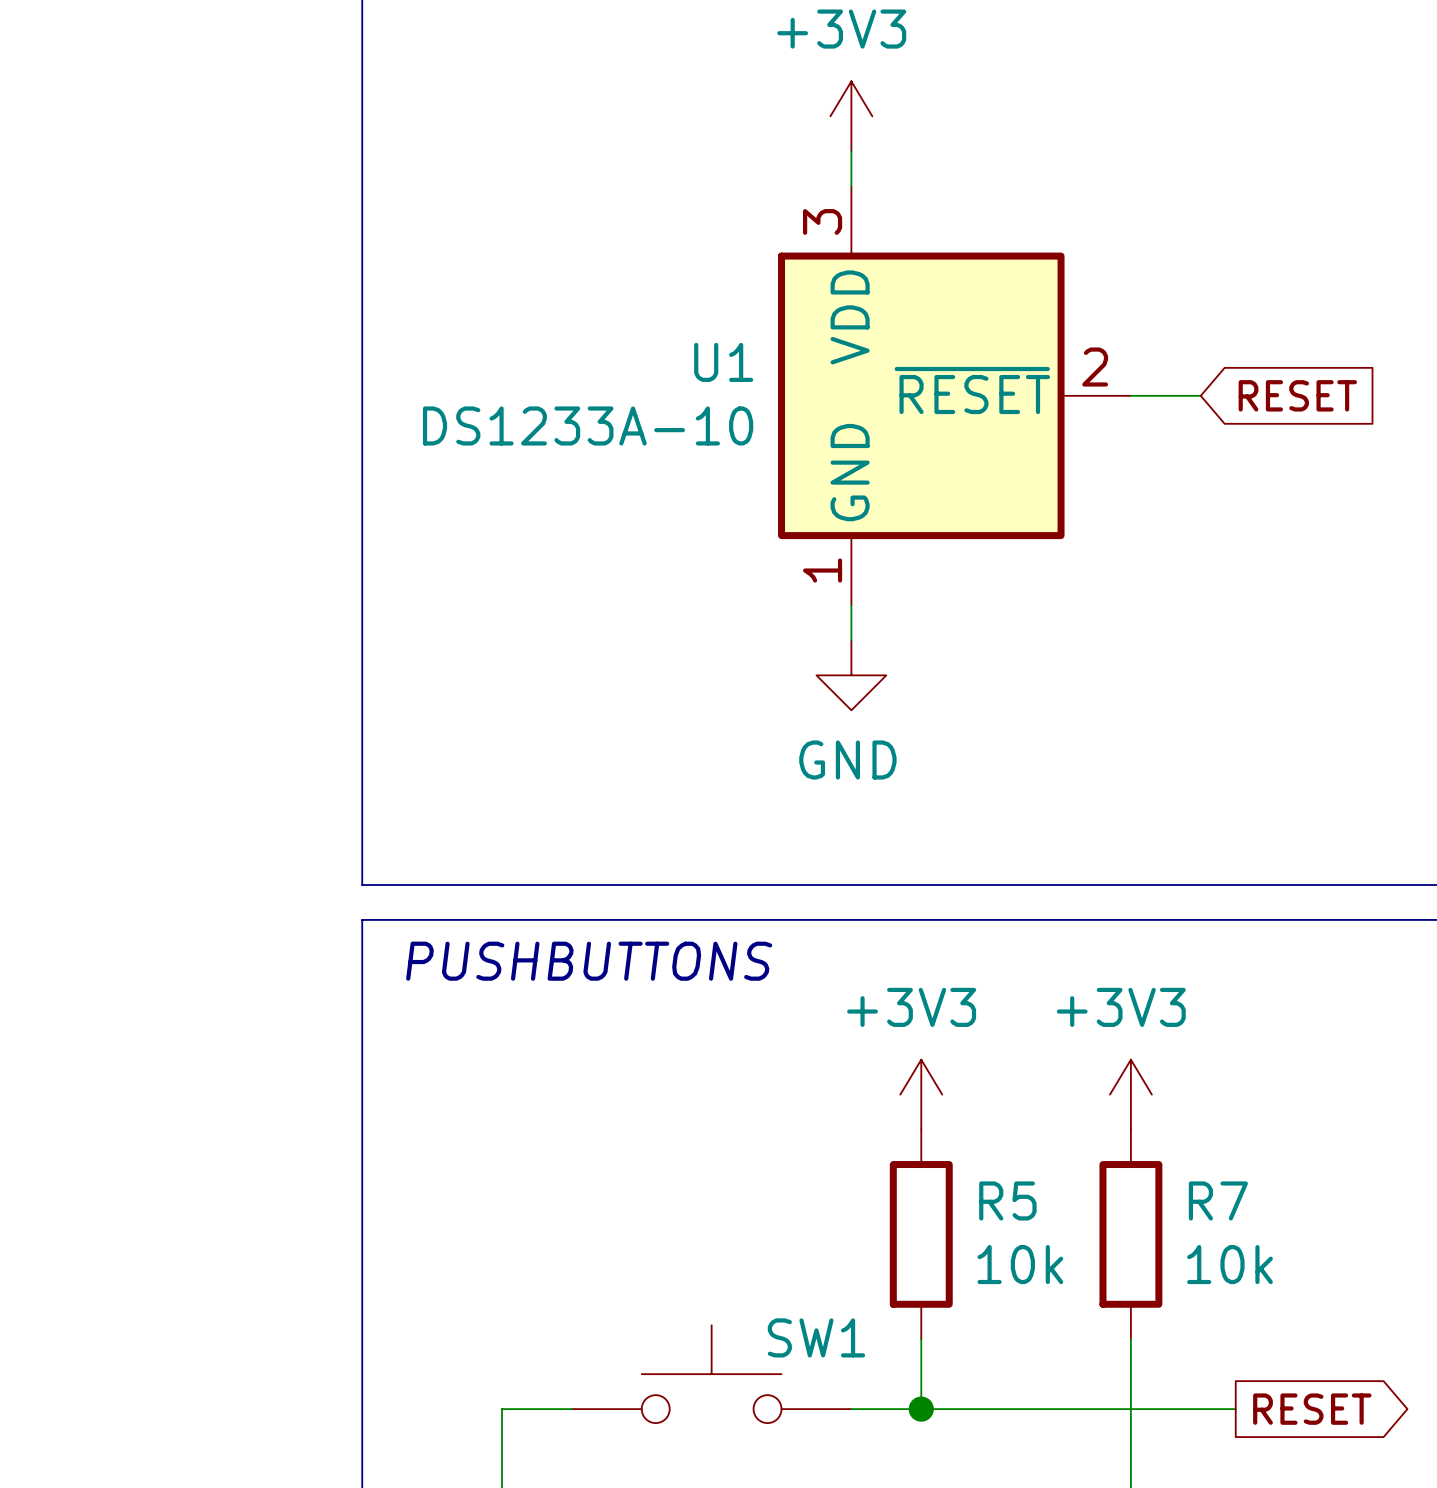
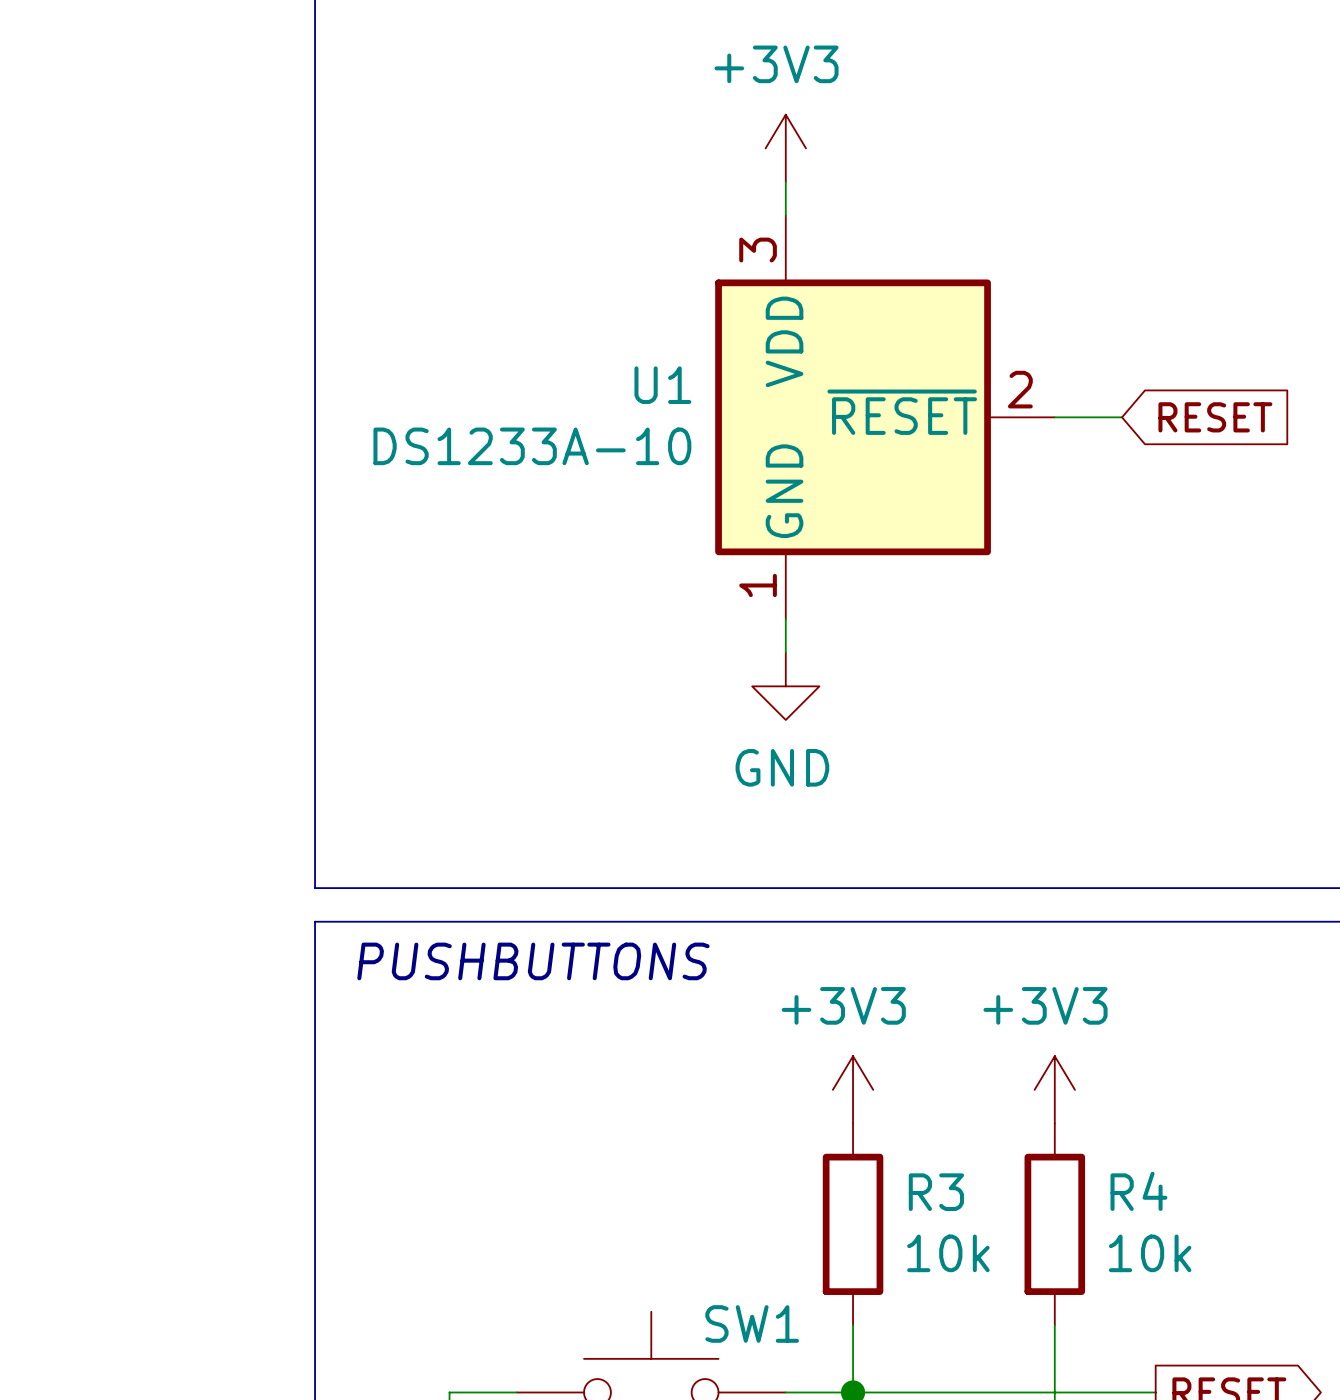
R5 name: R5 (1007, 1200) -> R3 (936, 1192)
R7 name: R7 (1218, 1200) -> R4 (1138, 1191)

